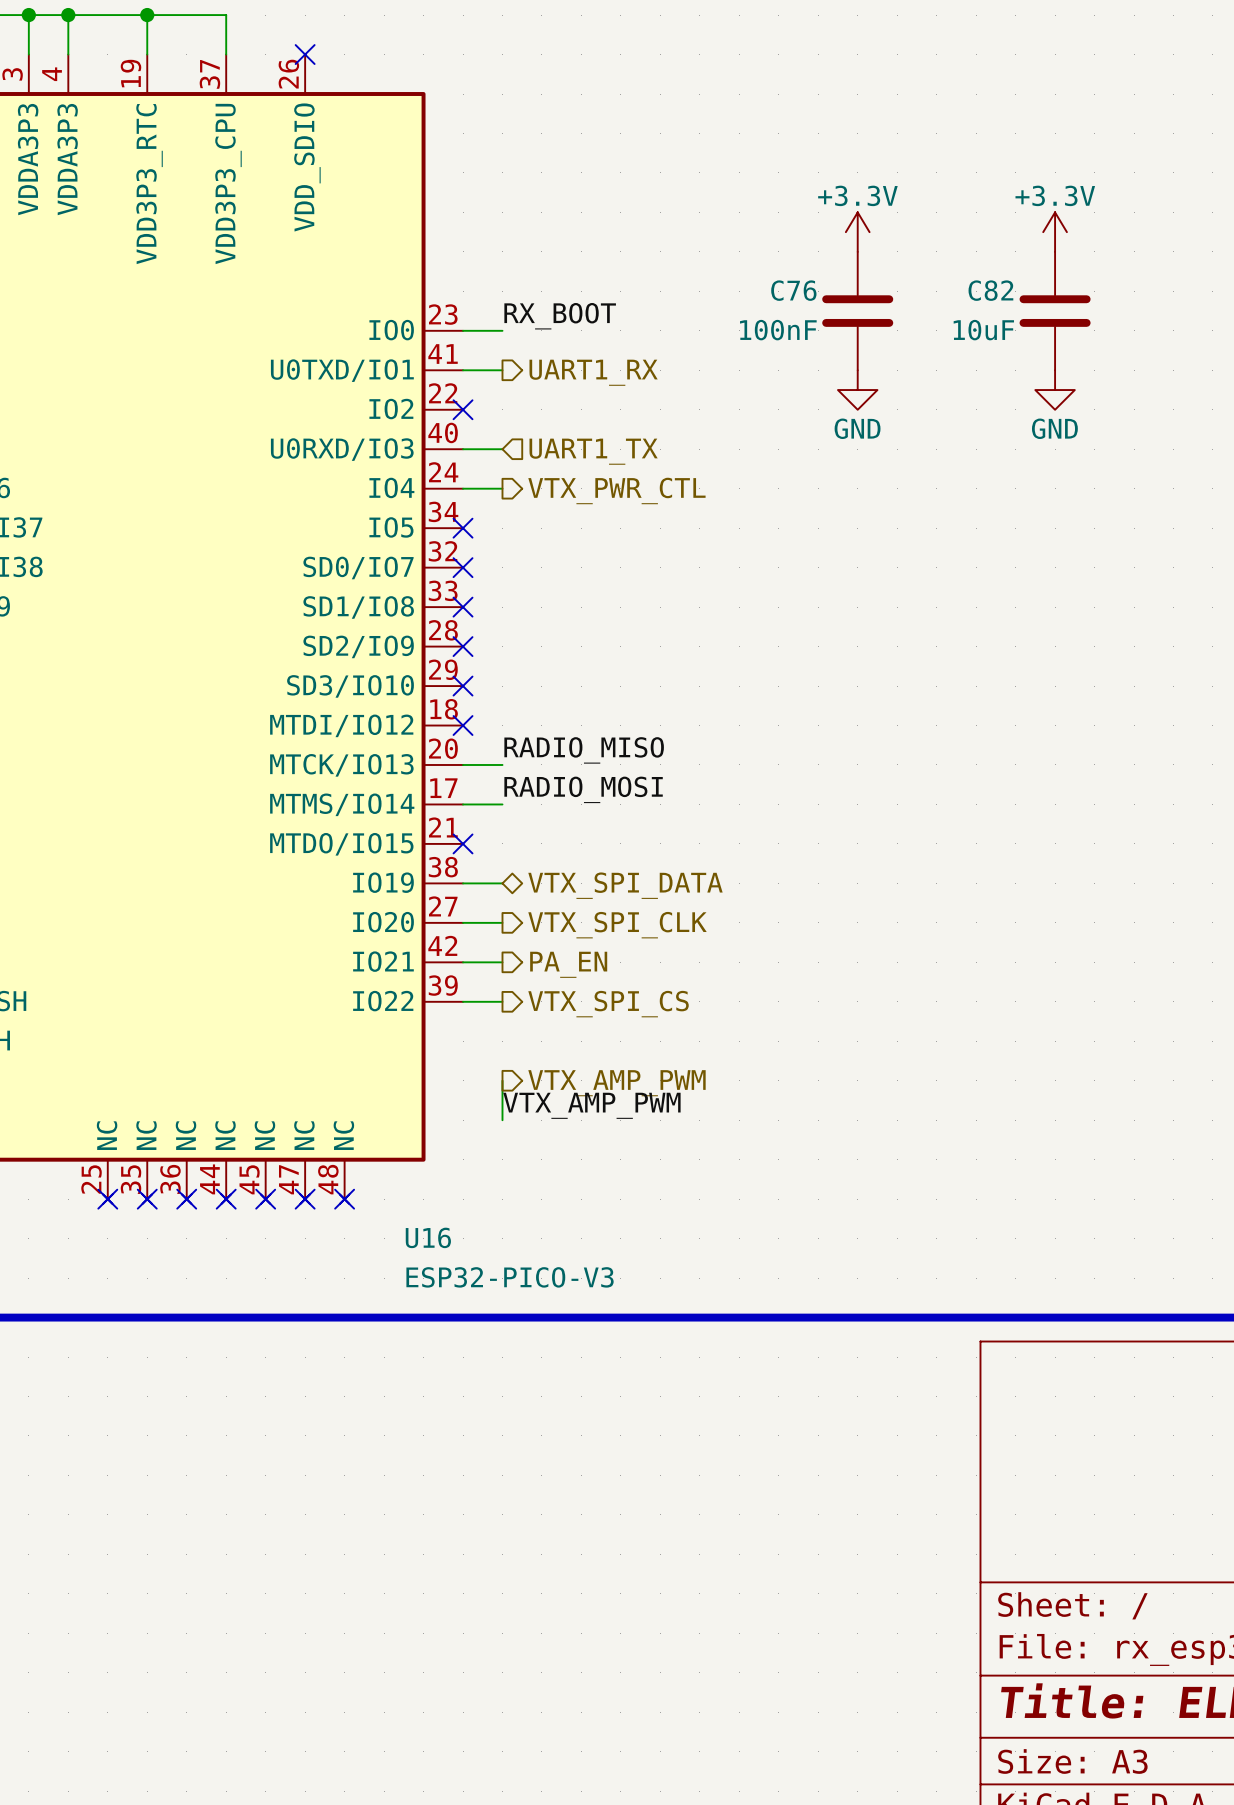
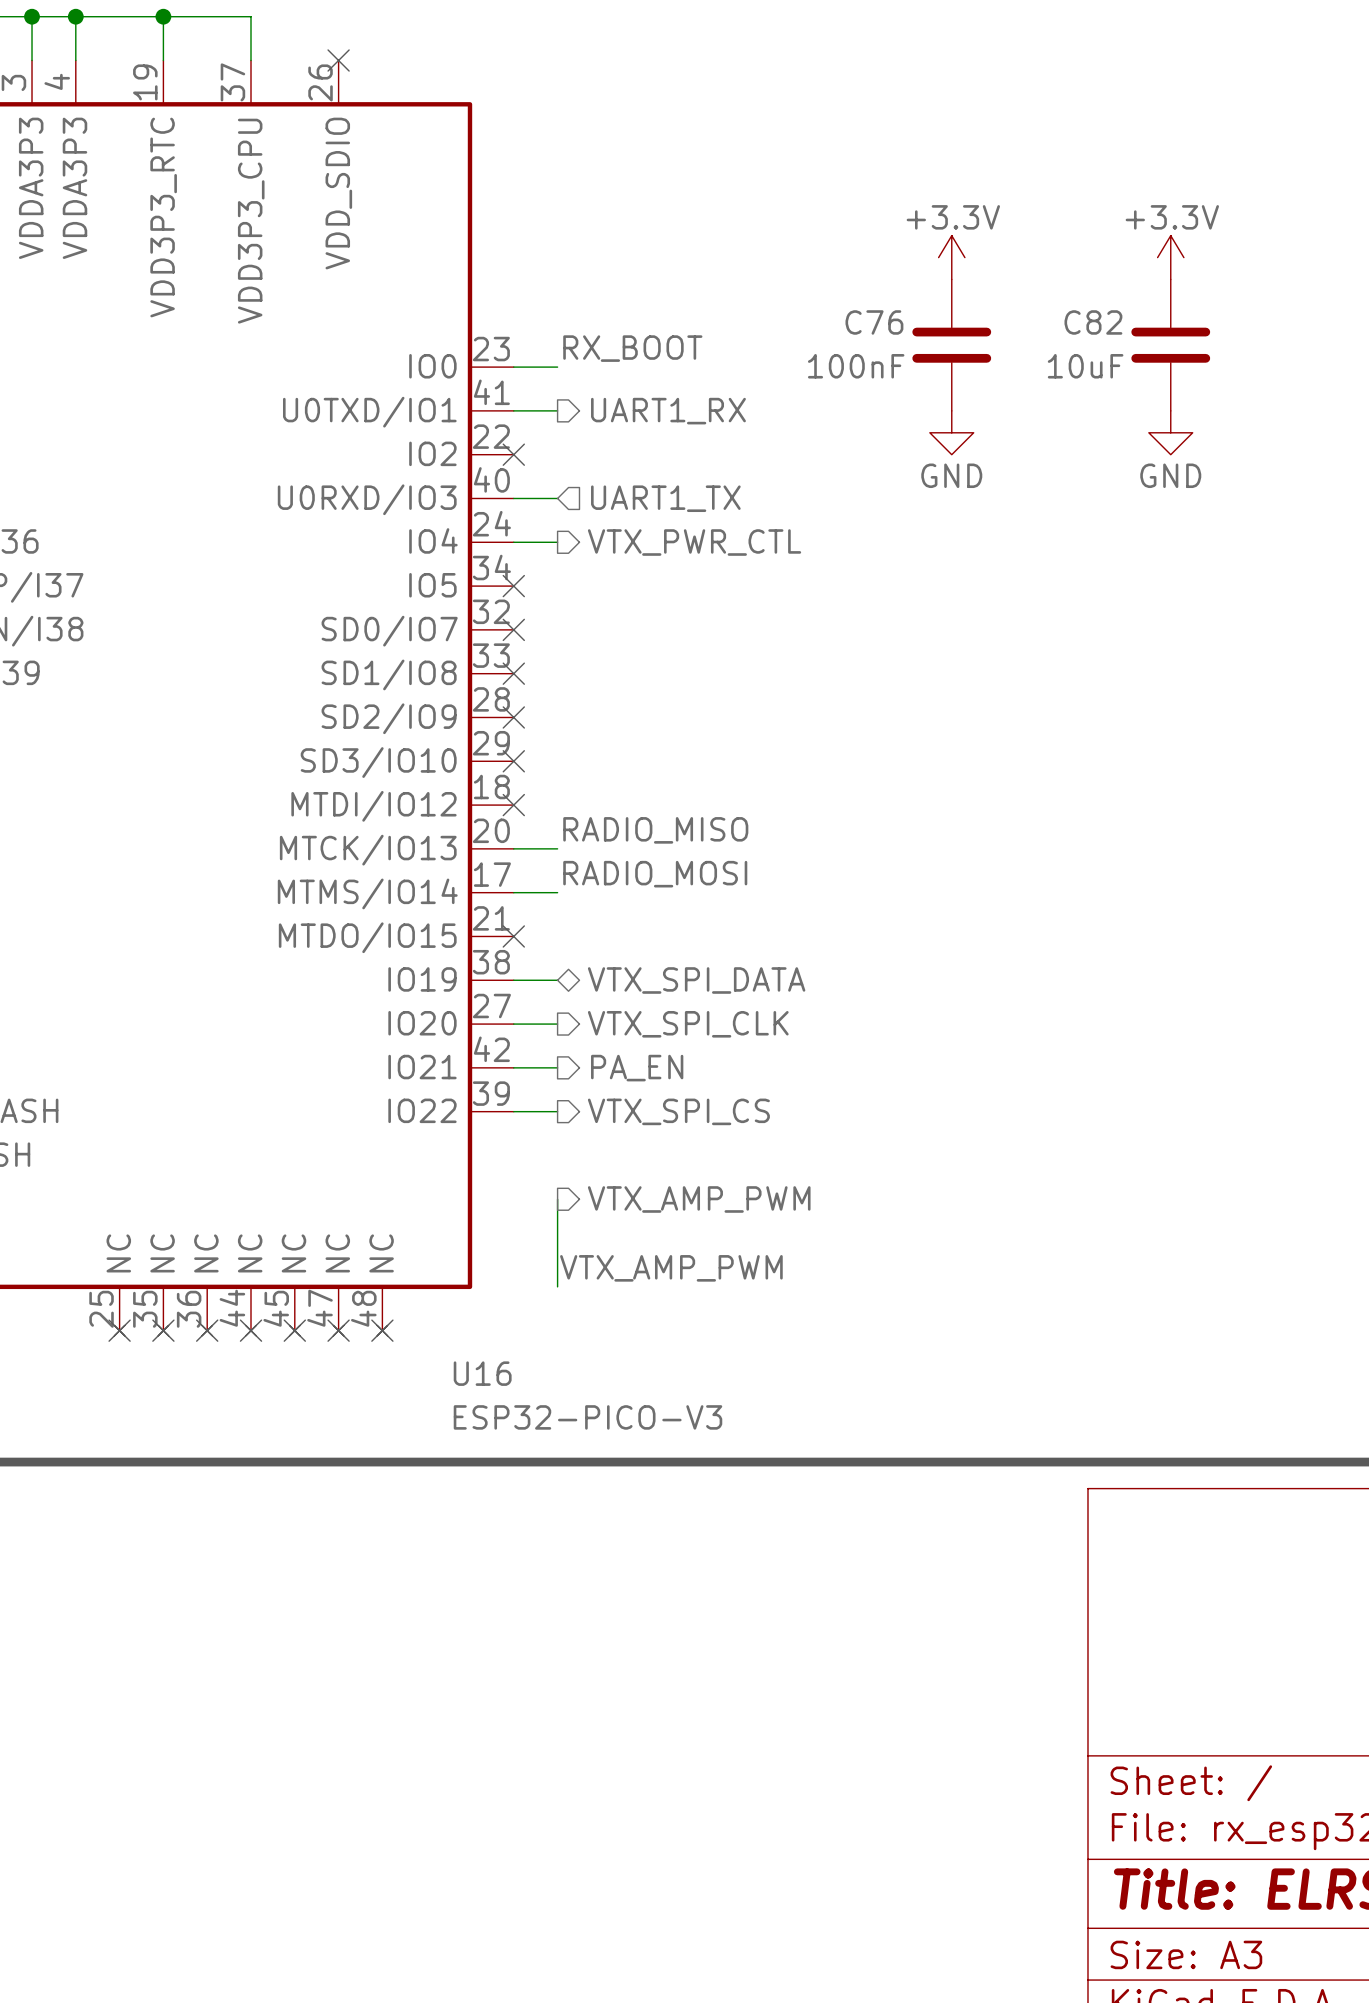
label position: VTX_AMP_PWM (591, 1105) -> VTX_AMP_PWM (671, 1268)
wire: none -> (557, 1243) (557, 1286)

